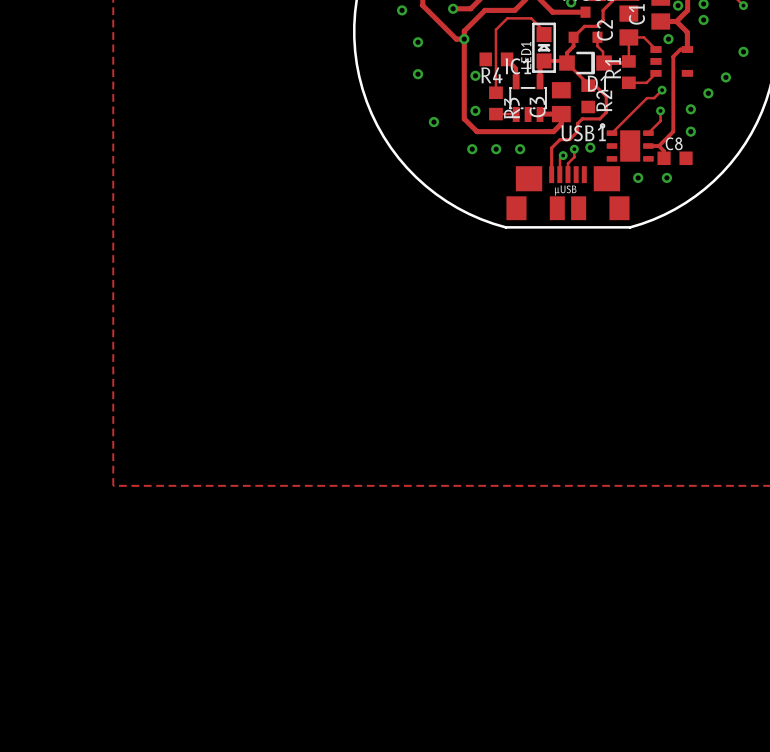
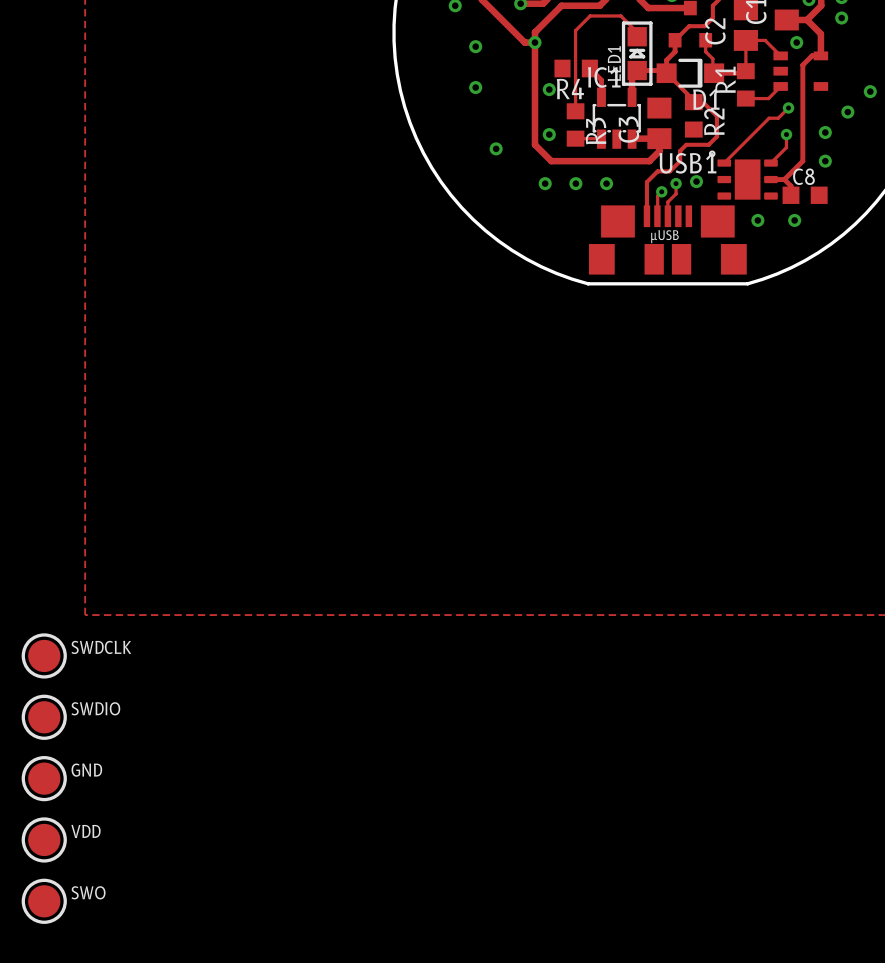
SWDCLK: none -> (44, 655)
SWDIO: none -> (44, 717)
GND: none -> (44, 778)
VDD: none -> (44, 839)
SWO: none -> (44, 901)

